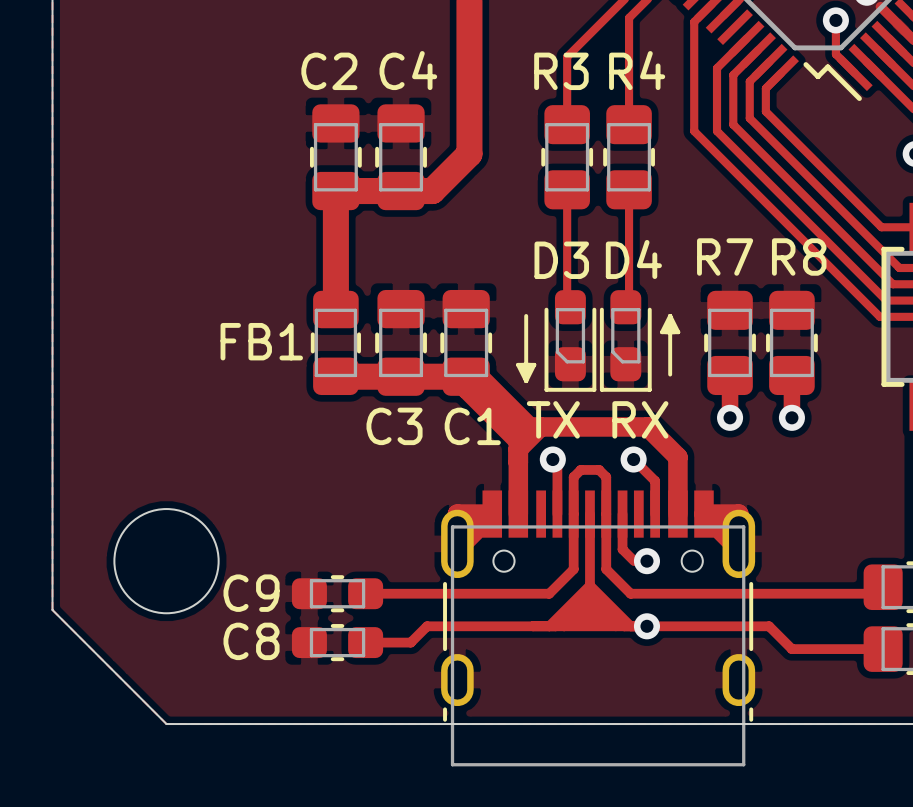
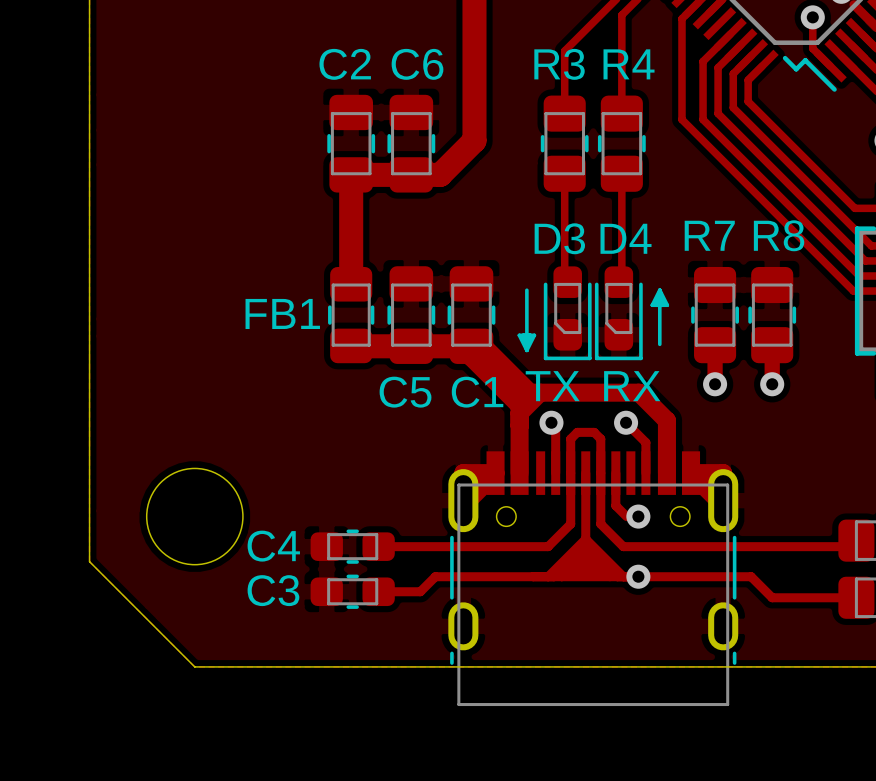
C4 name: C4 (408, 70) -> C6 (417, 64)
C3 name: C3 (394, 426) -> C5 (405, 392)
C9 name: C9 (251, 593) -> C4 (273, 546)
C8 name: C8 (251, 641) -> C3 (273, 590)

